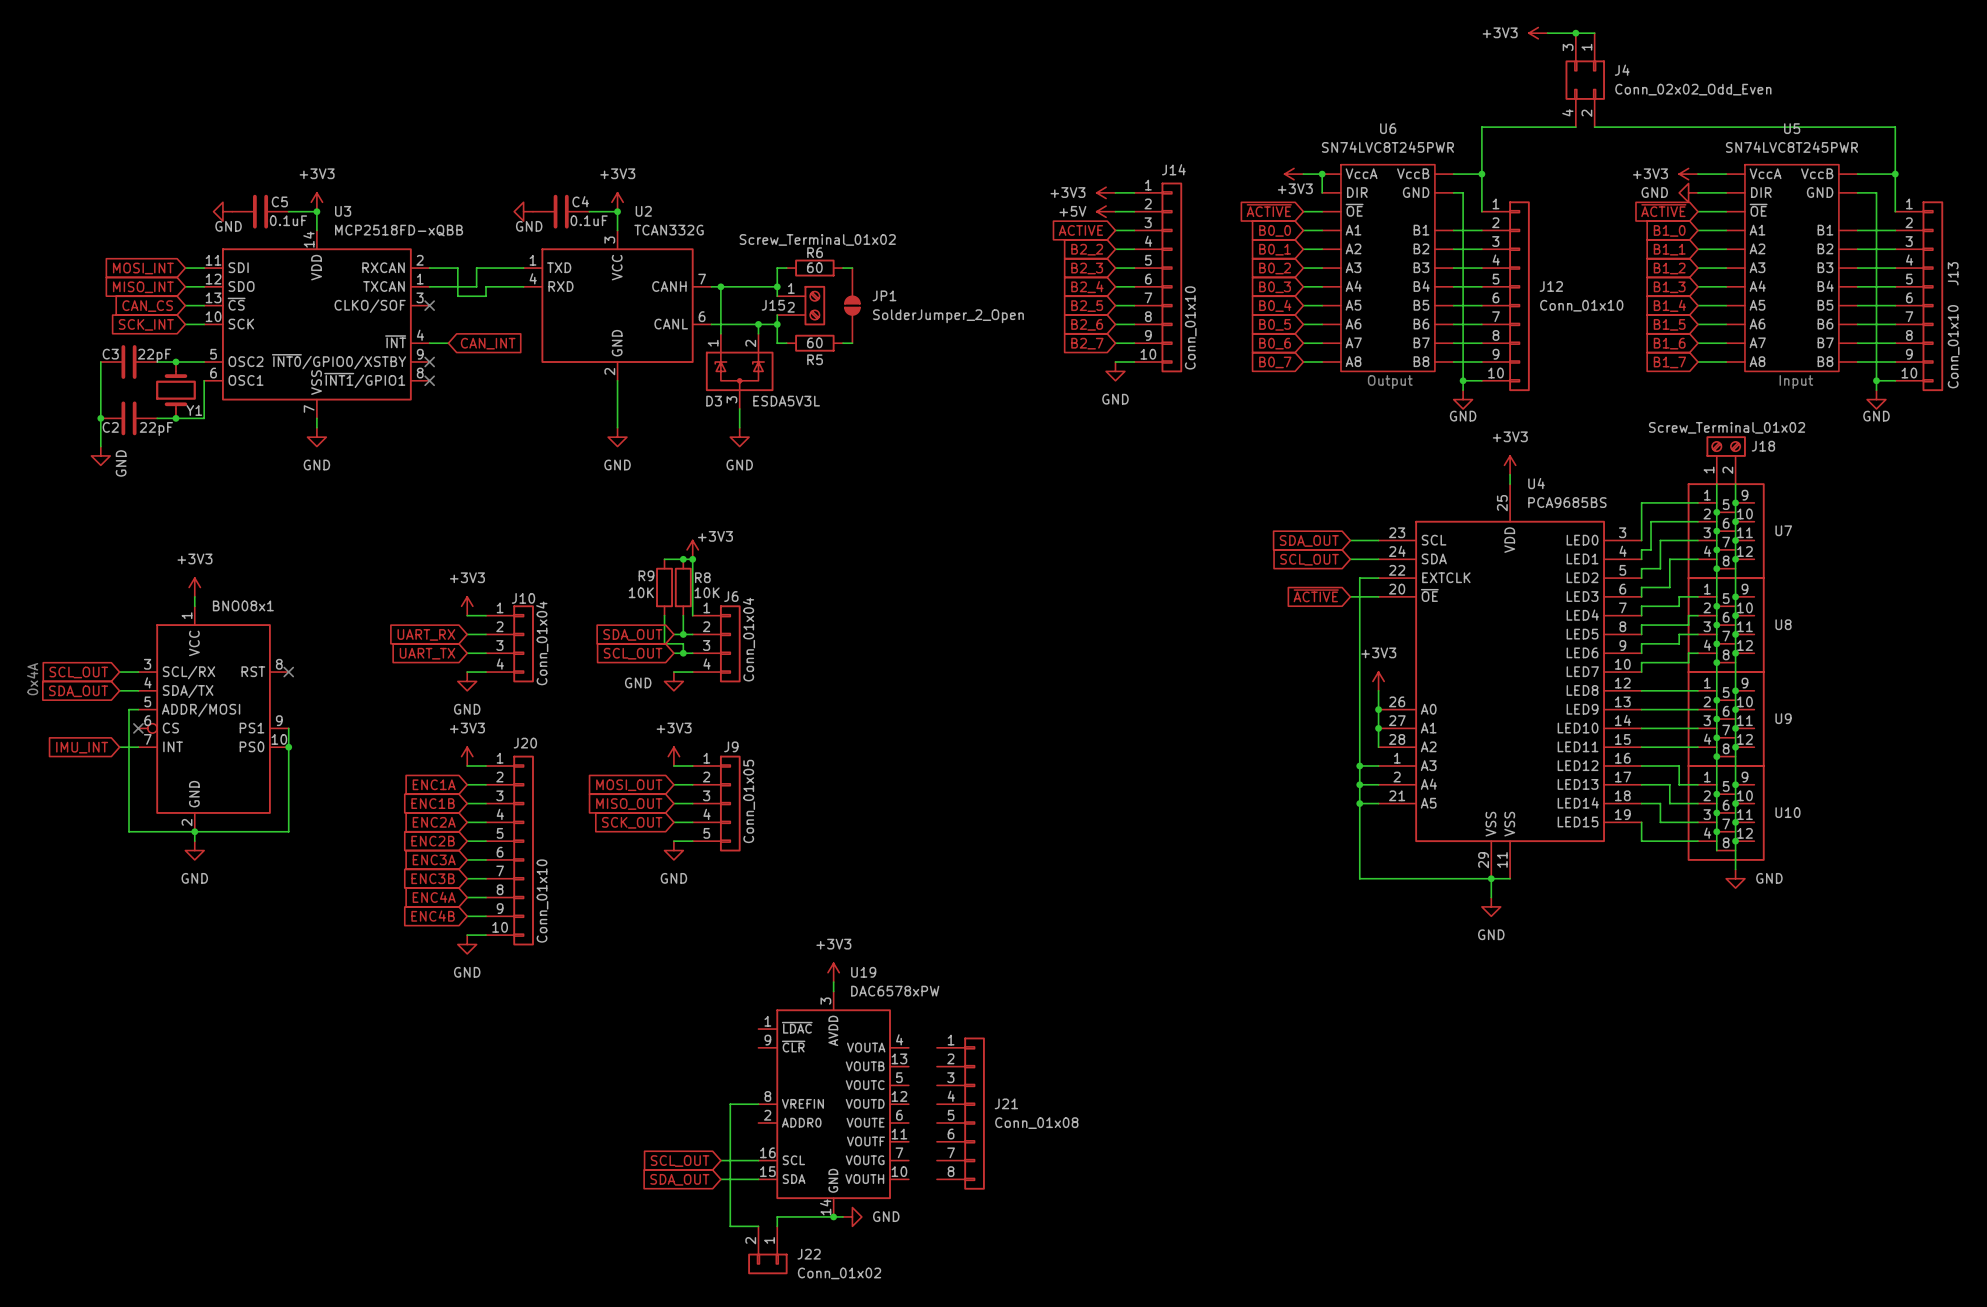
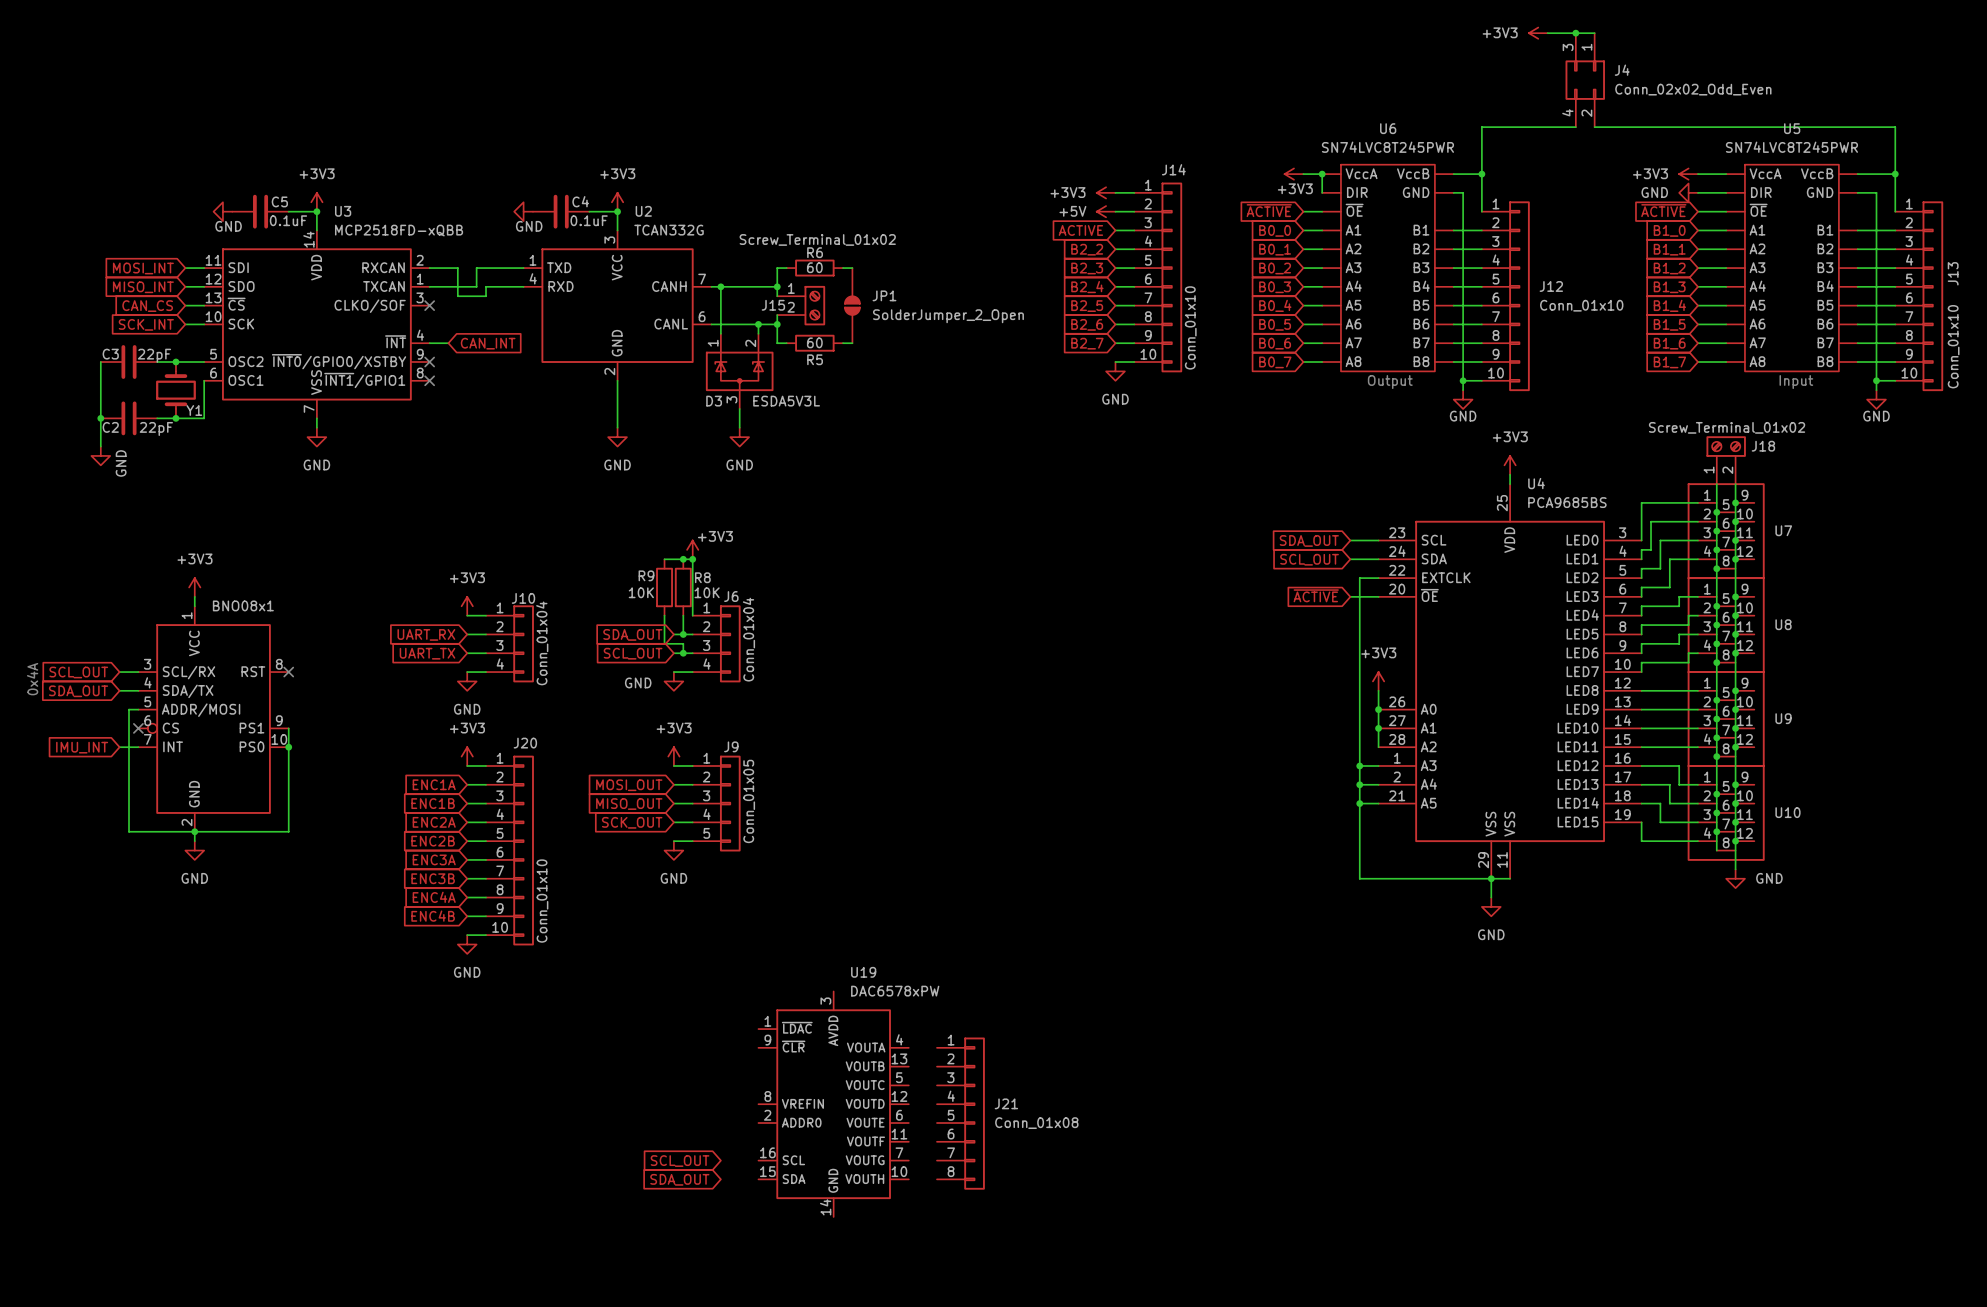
power symbol: +3V3 (833, 972) -> none
wire: (833, 982) (833, 991) -> none
wire: (758, 1104) (730, 1104) (730, 1226) (758, 1226) -> none
wire: (720, 1160) (758, 1160) -> none
wire: (720, 1179) (758, 1179) -> none
junction: (833, 1216) -> none
wire: (843, 1216) (777, 1216) (777, 1226) -> none
power symbol: GND (852, 1216) -> none
J22: Conn_01x02 (767, 1250) -> none

